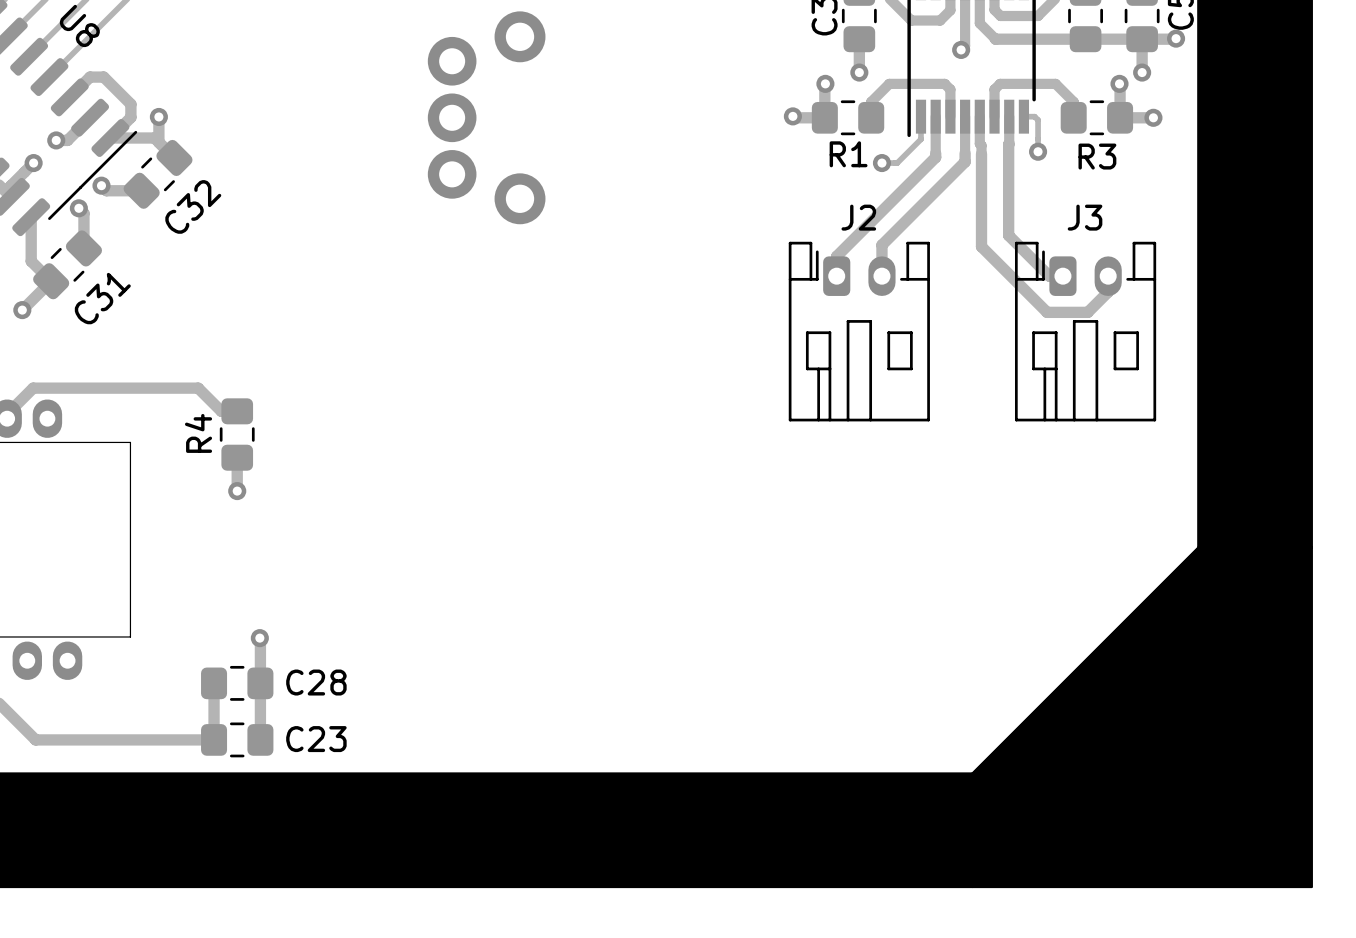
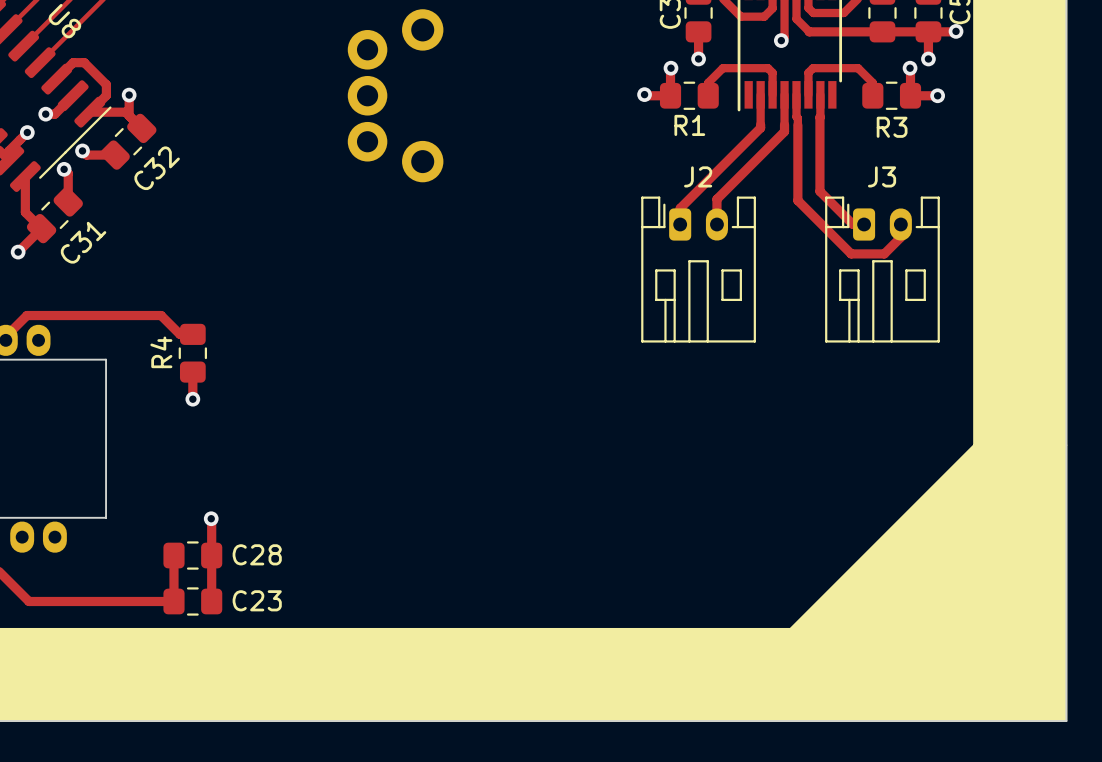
track: (920, 116) (920, 139) (897, 163) (881, 163) -> none
track: (1023, 116) (1034, 116) (1038, 120) (1038, 151) -> none
via: (1038, 151) -> none
via: (881, 163) -> none

